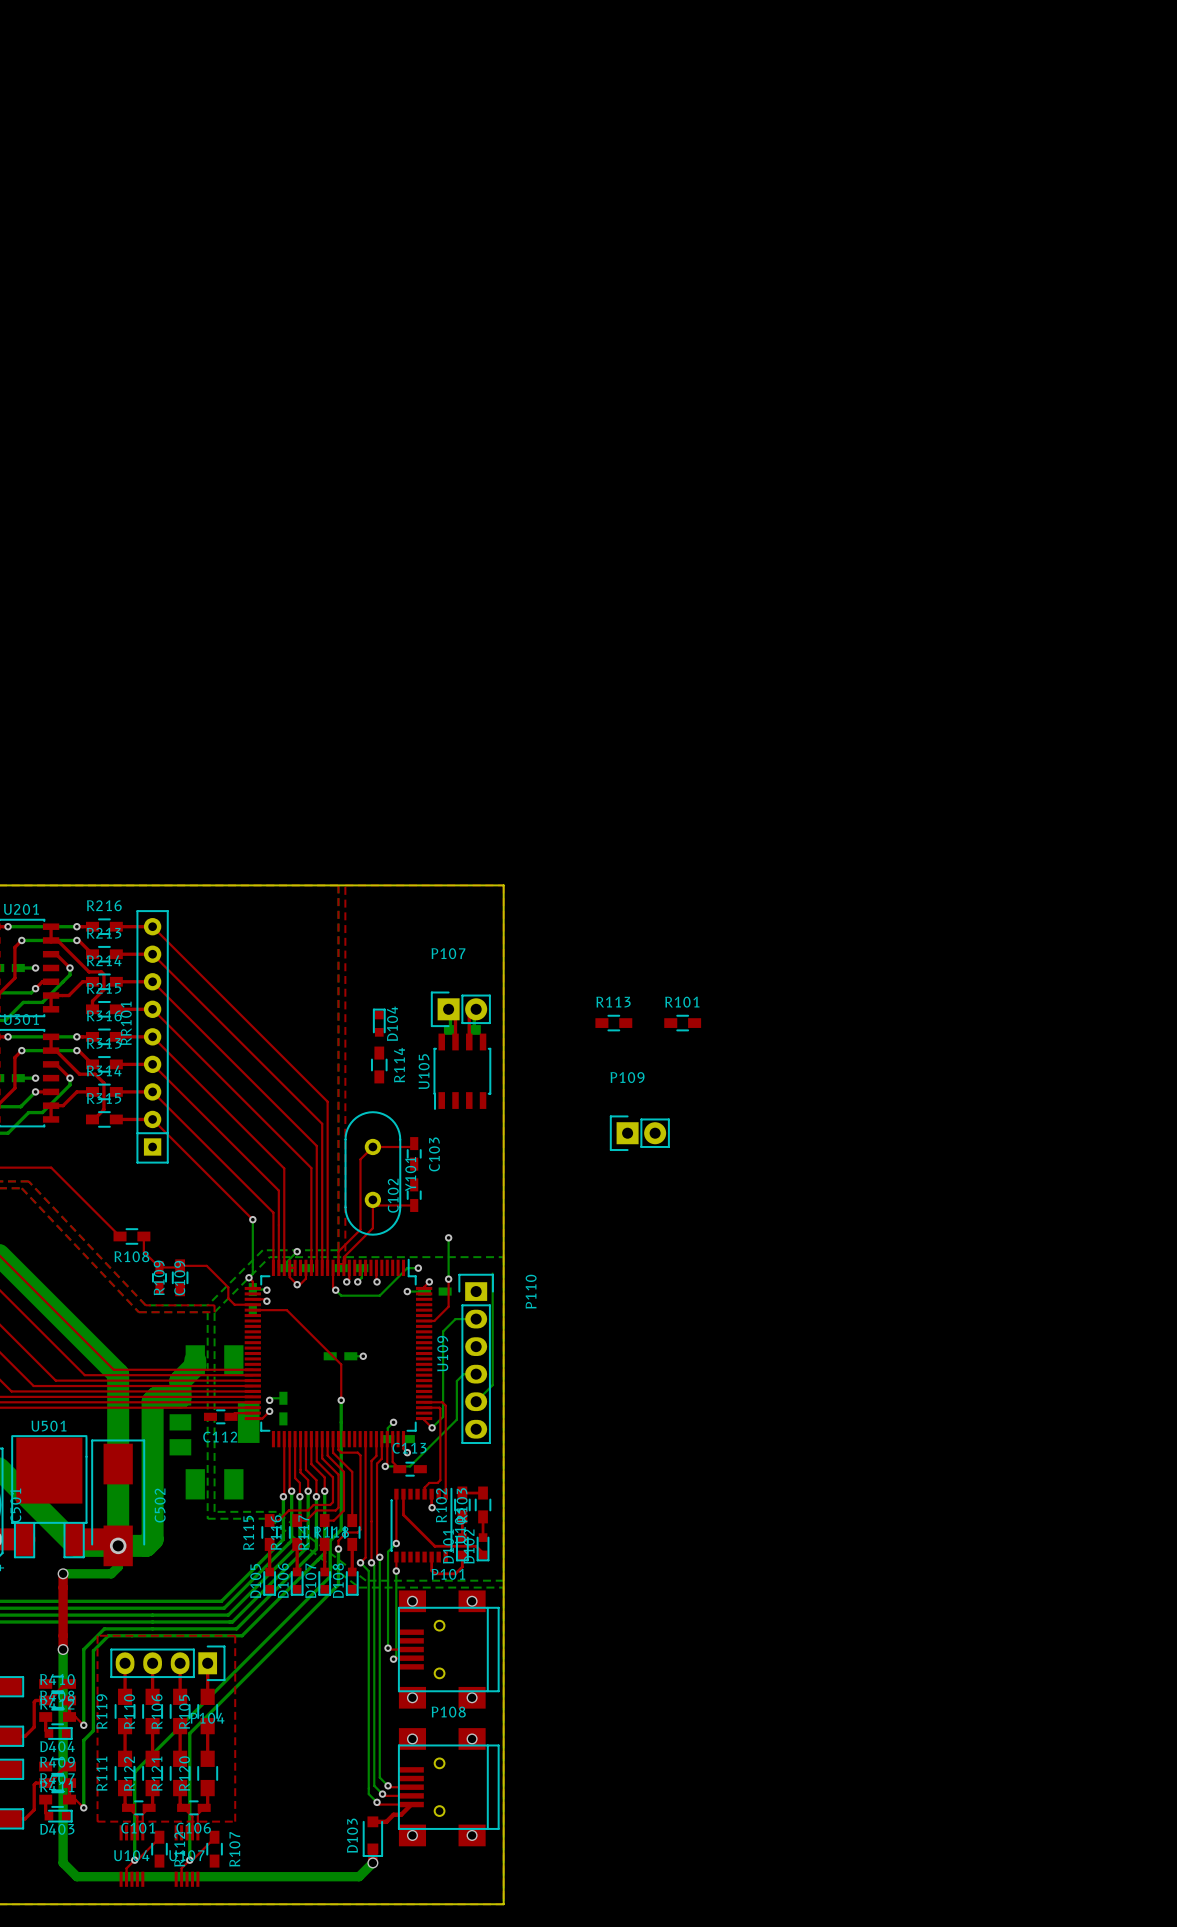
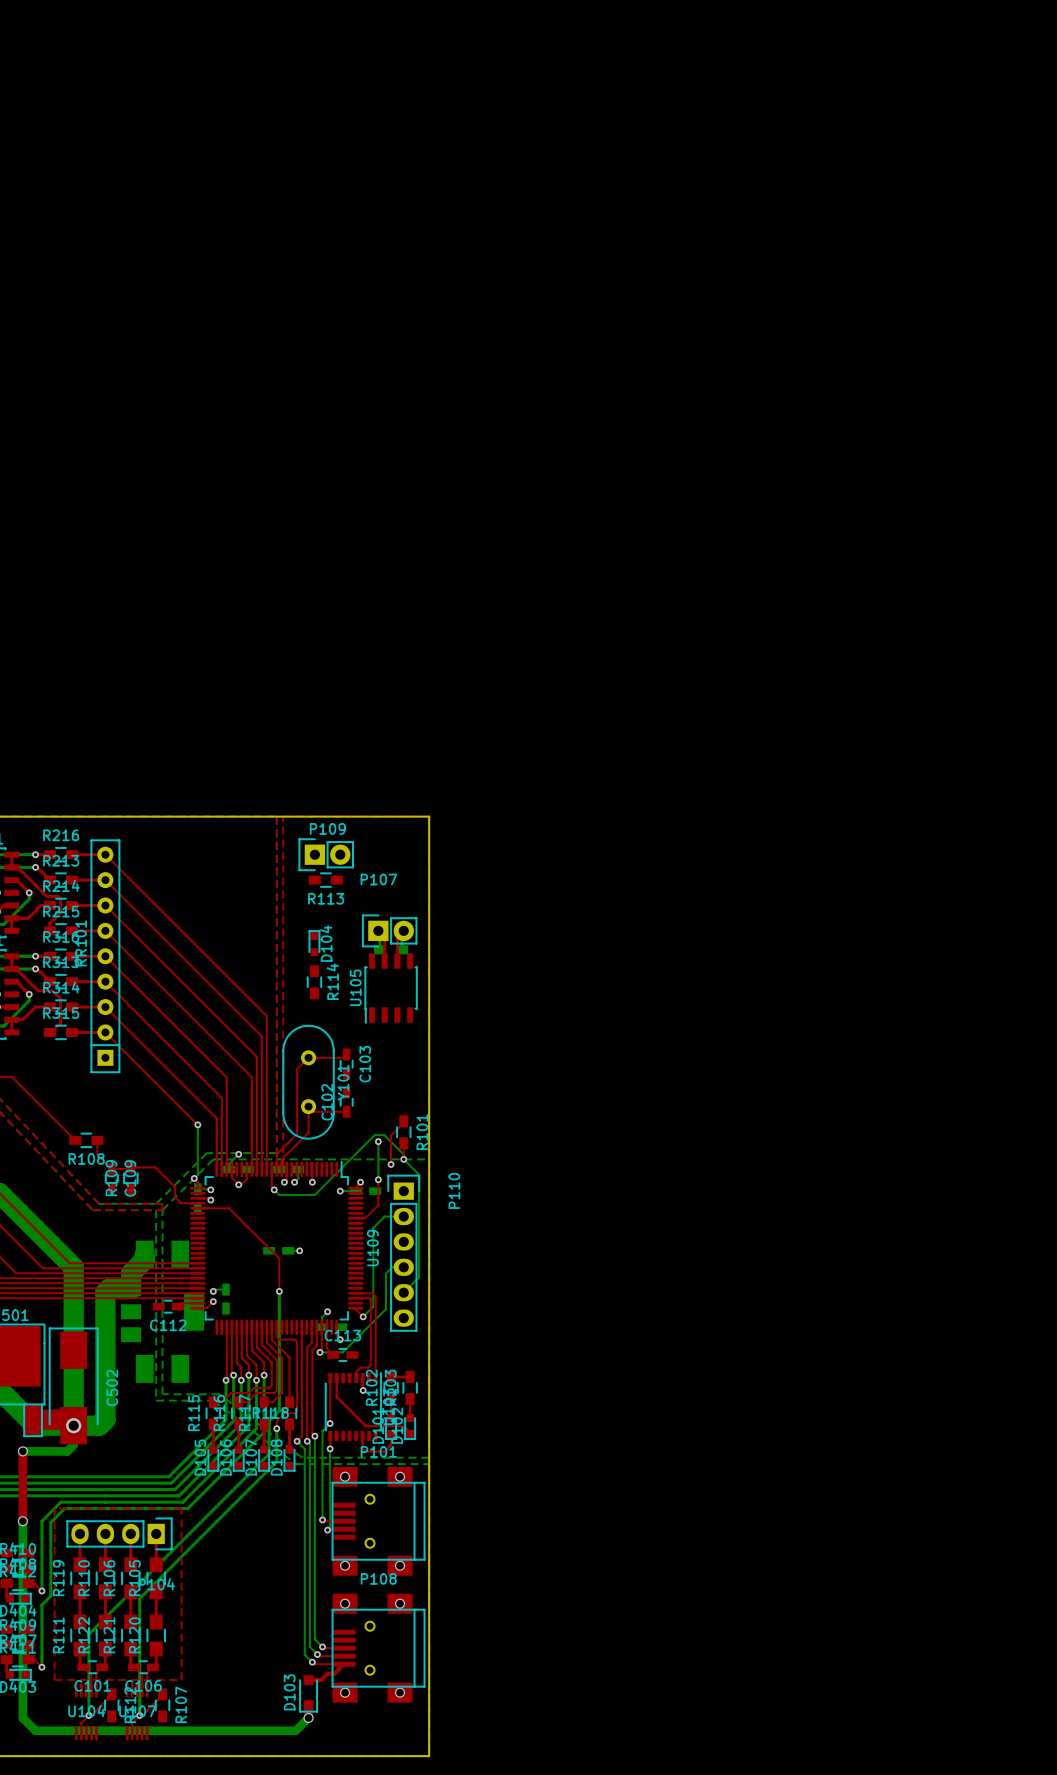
R113 name position: R113 (613, 1002) -> R113 (326, 898)
R113 position: (613, 1023) -> (325, 880)
R101 rotation: 0° (682, 1023) -> 90° clockwise (403, 1132)
R101 position: (682, 1023) -> (403, 1132)
P109 name position: P109 (627, 1077) -> P109 (327, 828)
P109 position: (639, 1133) -> (326, 854)
top track: none -> (403, 1121) (391, 1135) (391, 1164)
top track: none -> (403, 1143) (403, 1159)
via: none -> (403, 1159)
via: none -> (391, 1164)
bottom track: (407, 1268) (418, 1268) -> (340, 1169) (374, 1135) (384, 1135) (403, 1154) (403, 1159) (419, 1174)
via: (418, 1268) -> none

